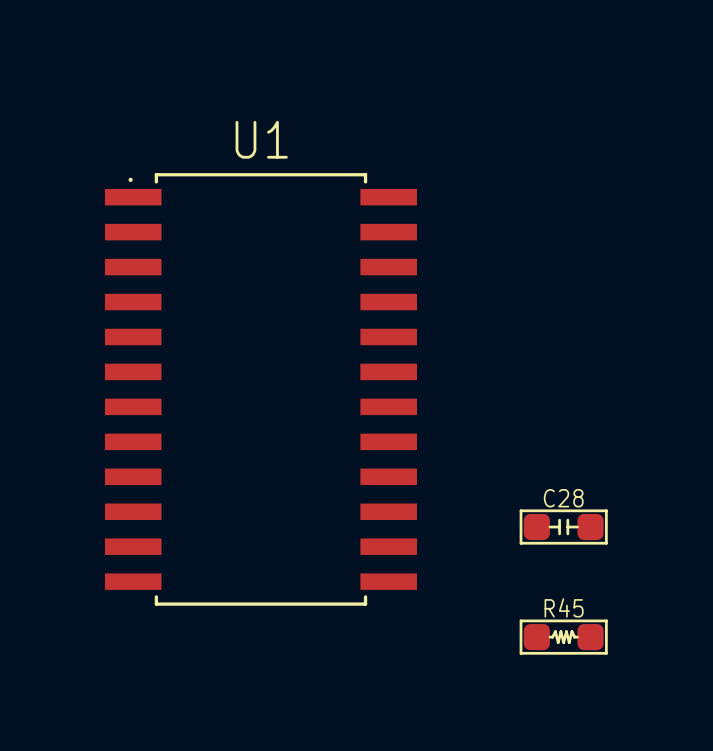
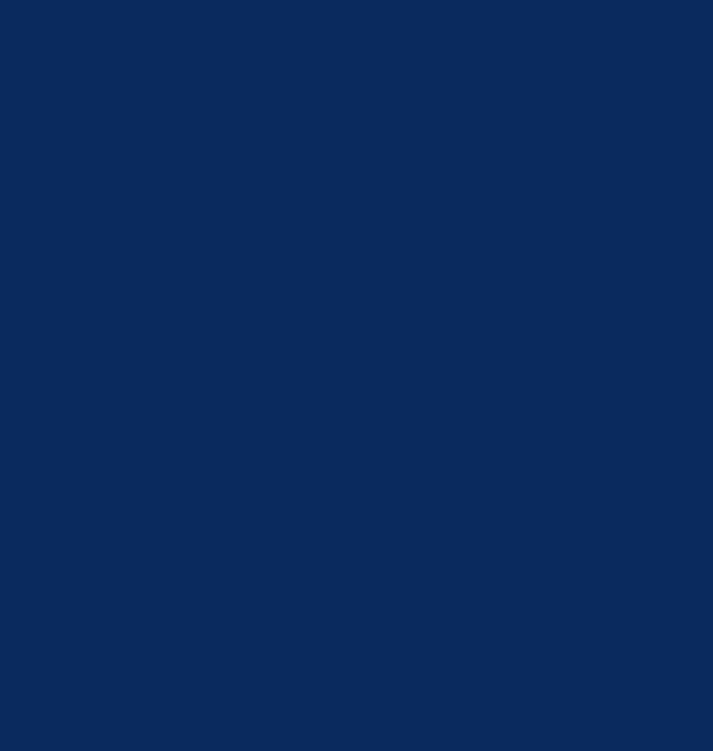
U1: (260, 389) -> none
C28: (563, 527) -> none
R45: (563, 637) -> none

